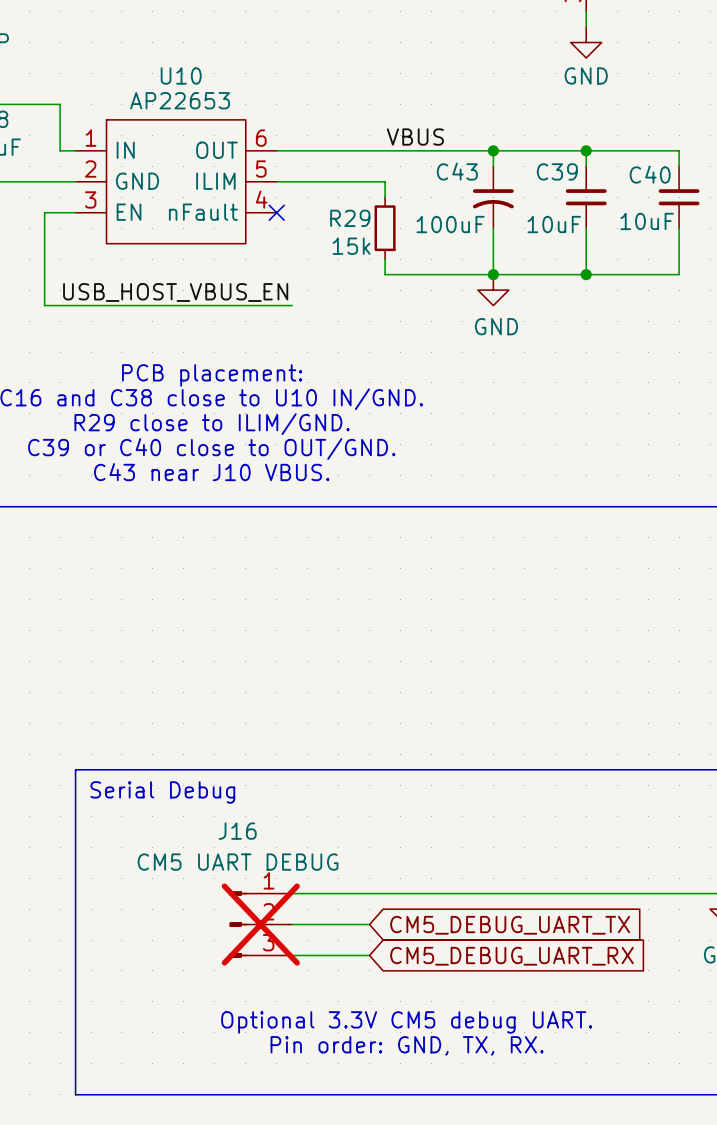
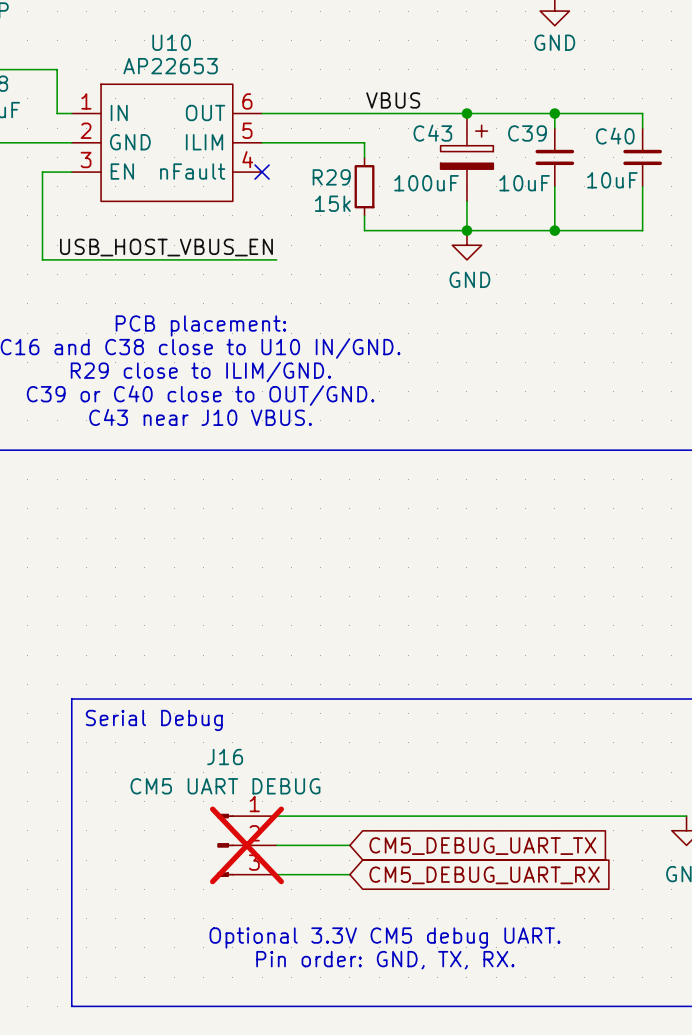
C43 symbol: [472, 166, 514, 229] -> [440, 113, 494, 202]

